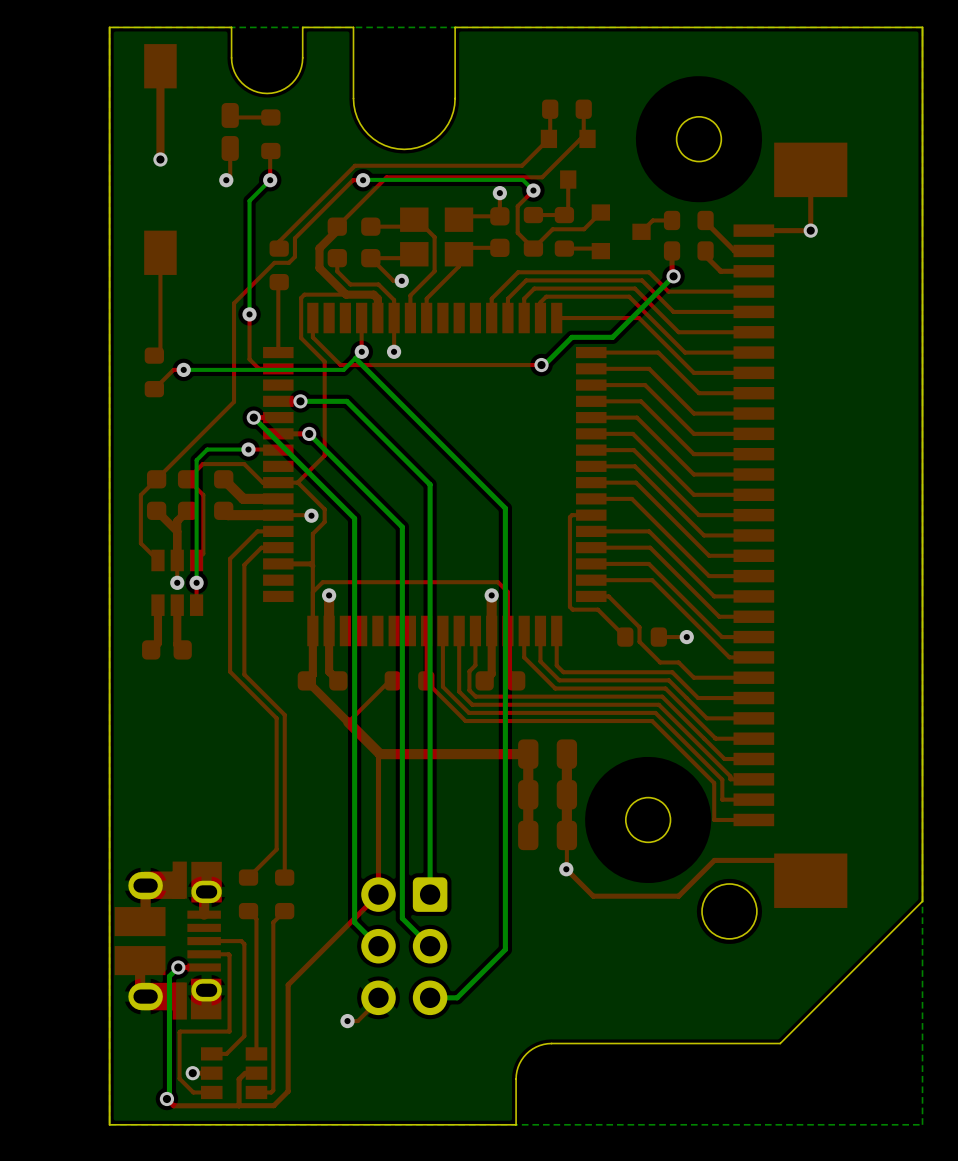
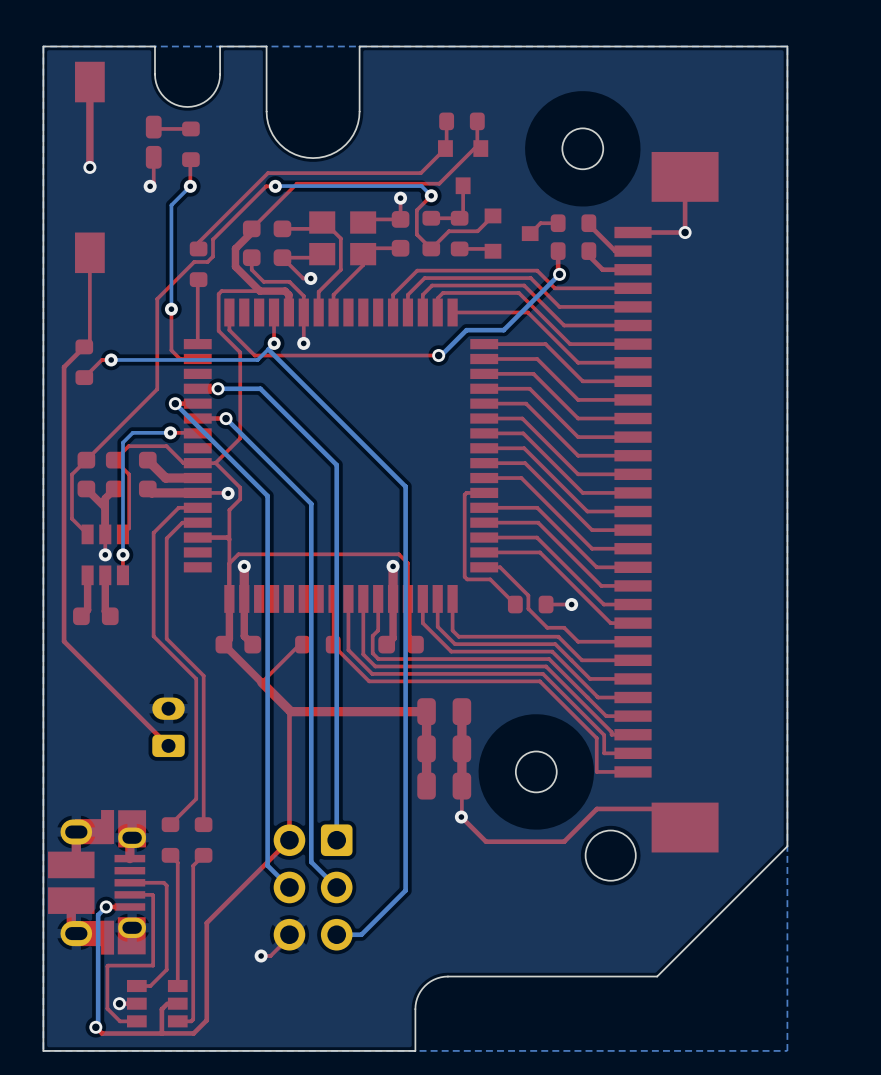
top track: none -> (84, 346) (64, 367) (64, 641) (168, 745)
part: none -> (168, 727)

